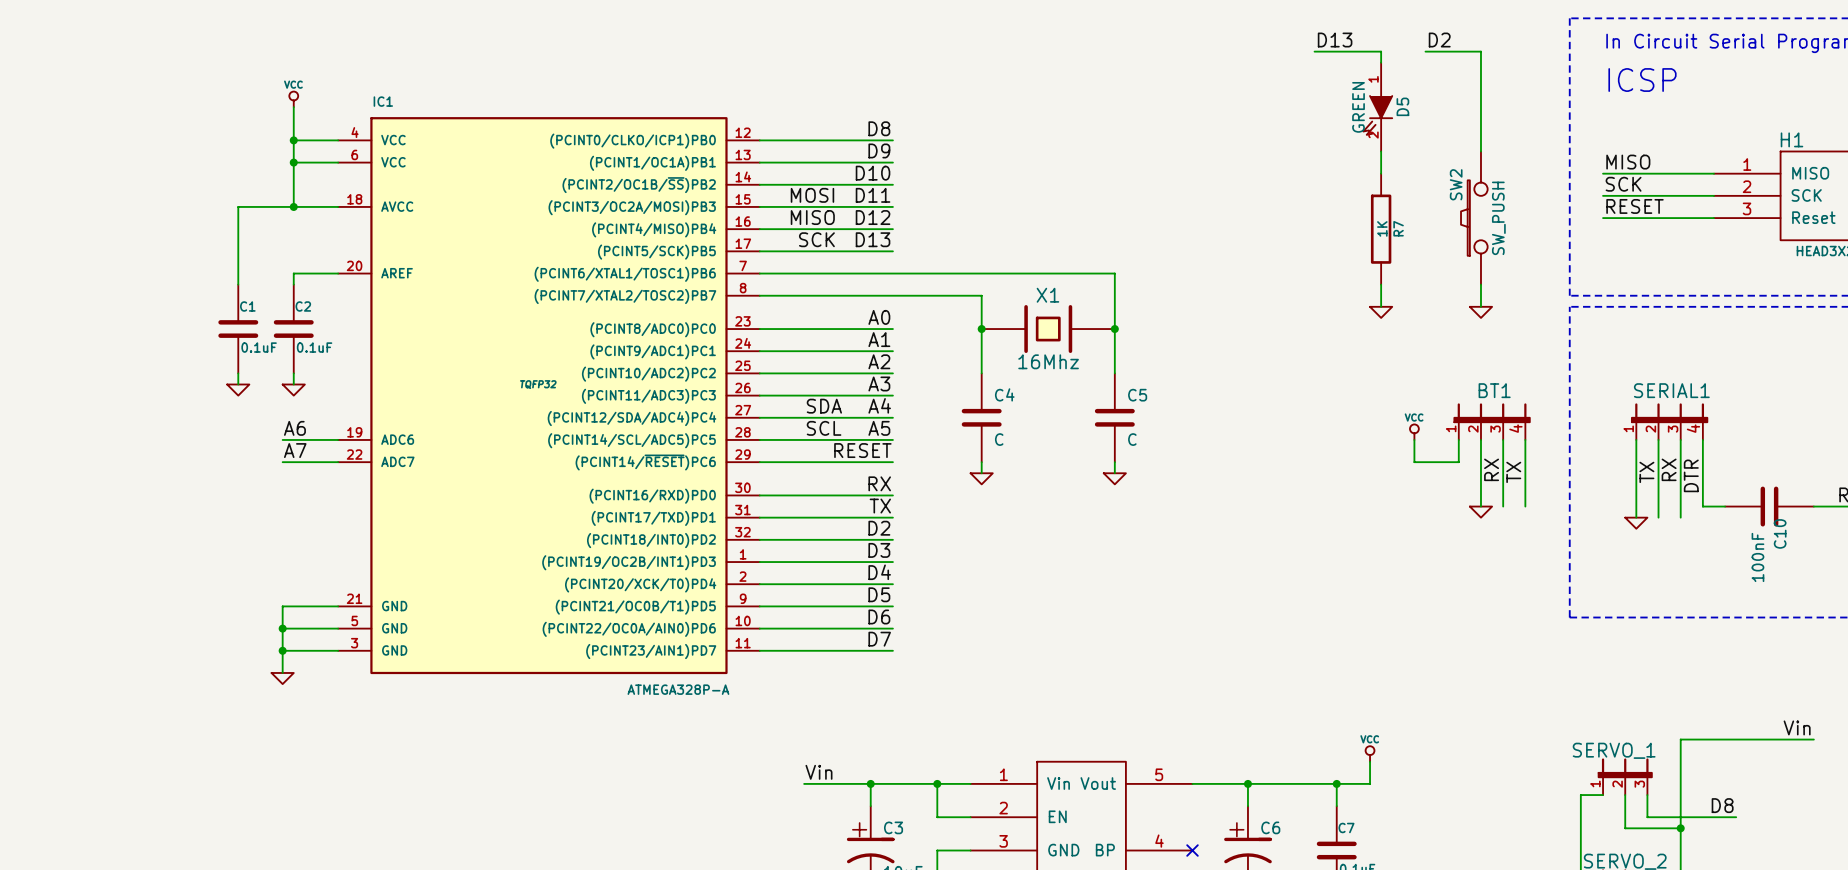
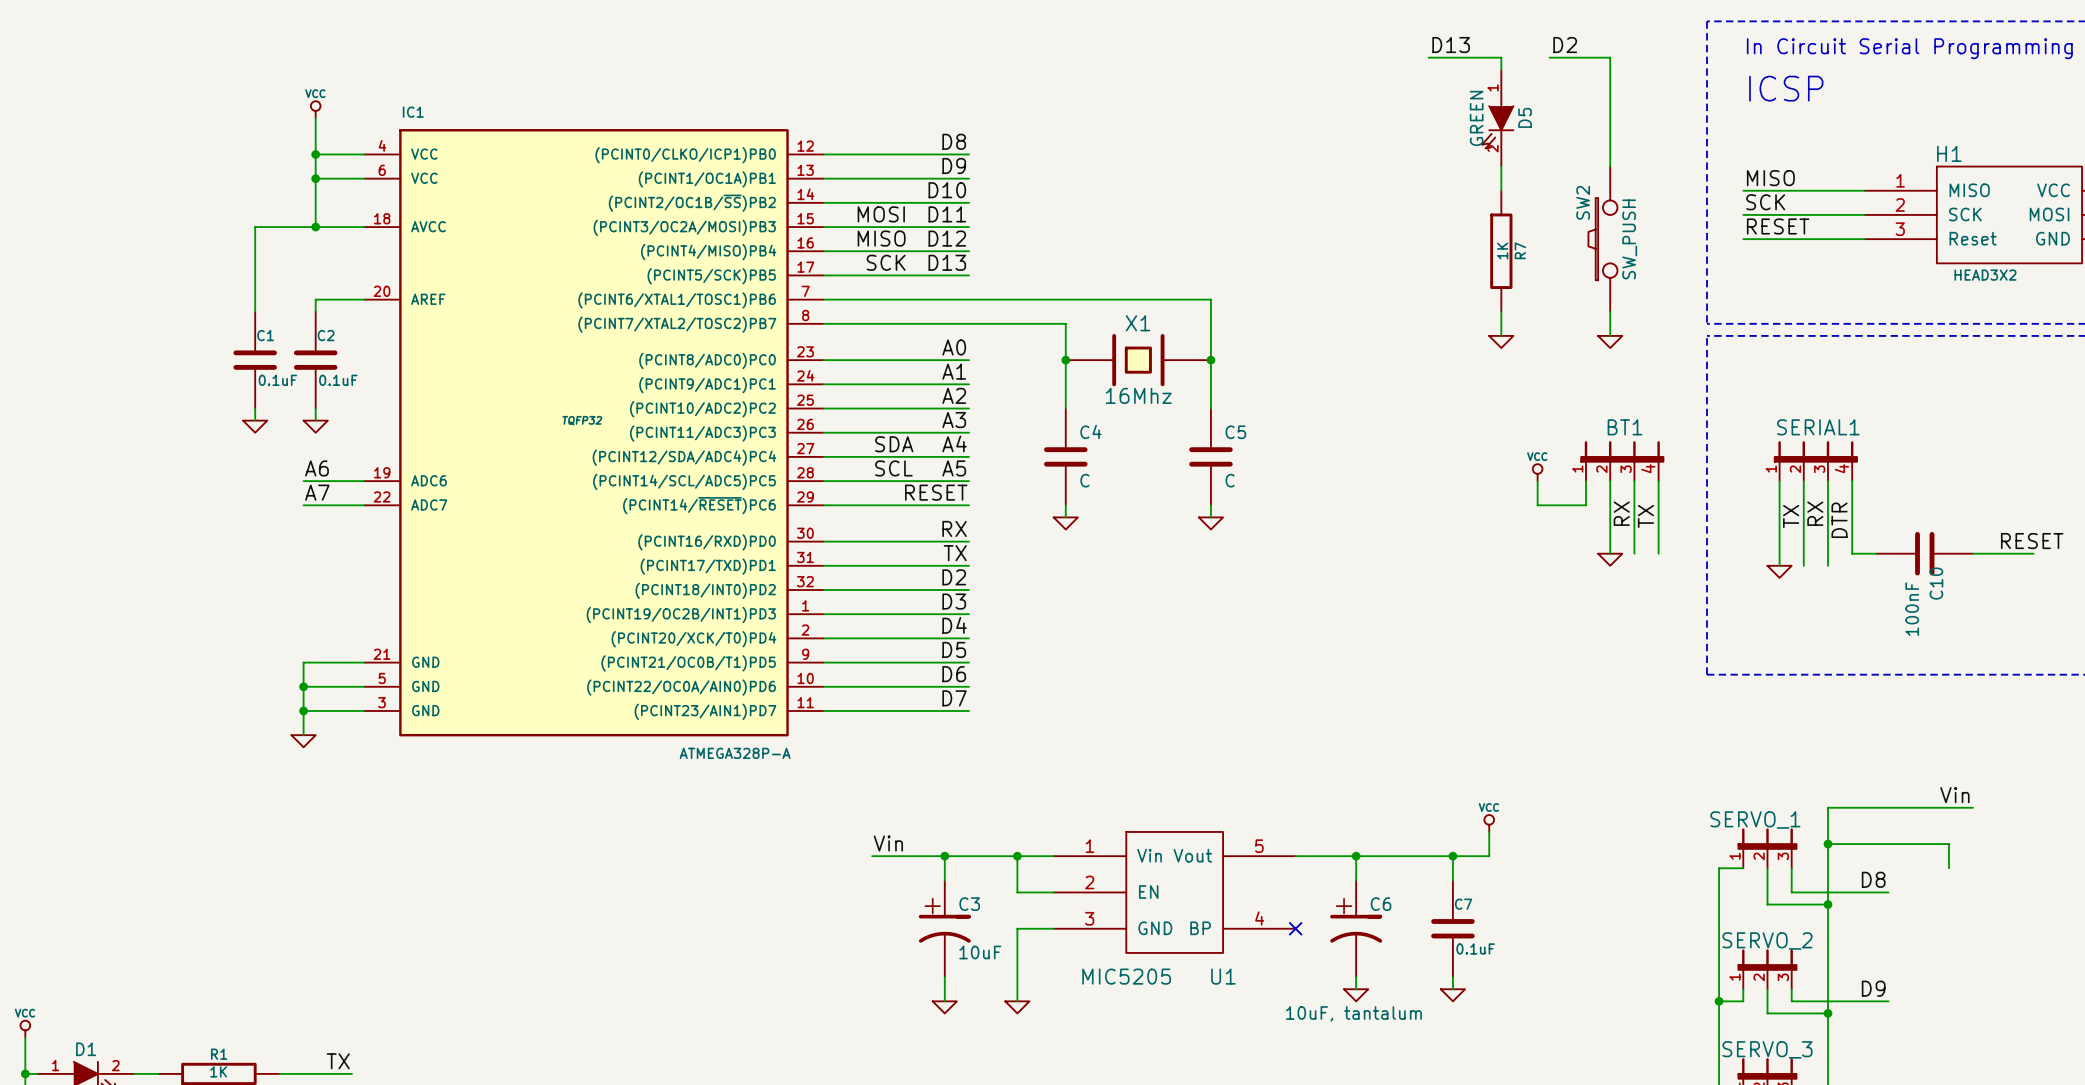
wire: none -> (1827, 844) (1948, 844) (1948, 868)
junction: none -> (1827, 844)

